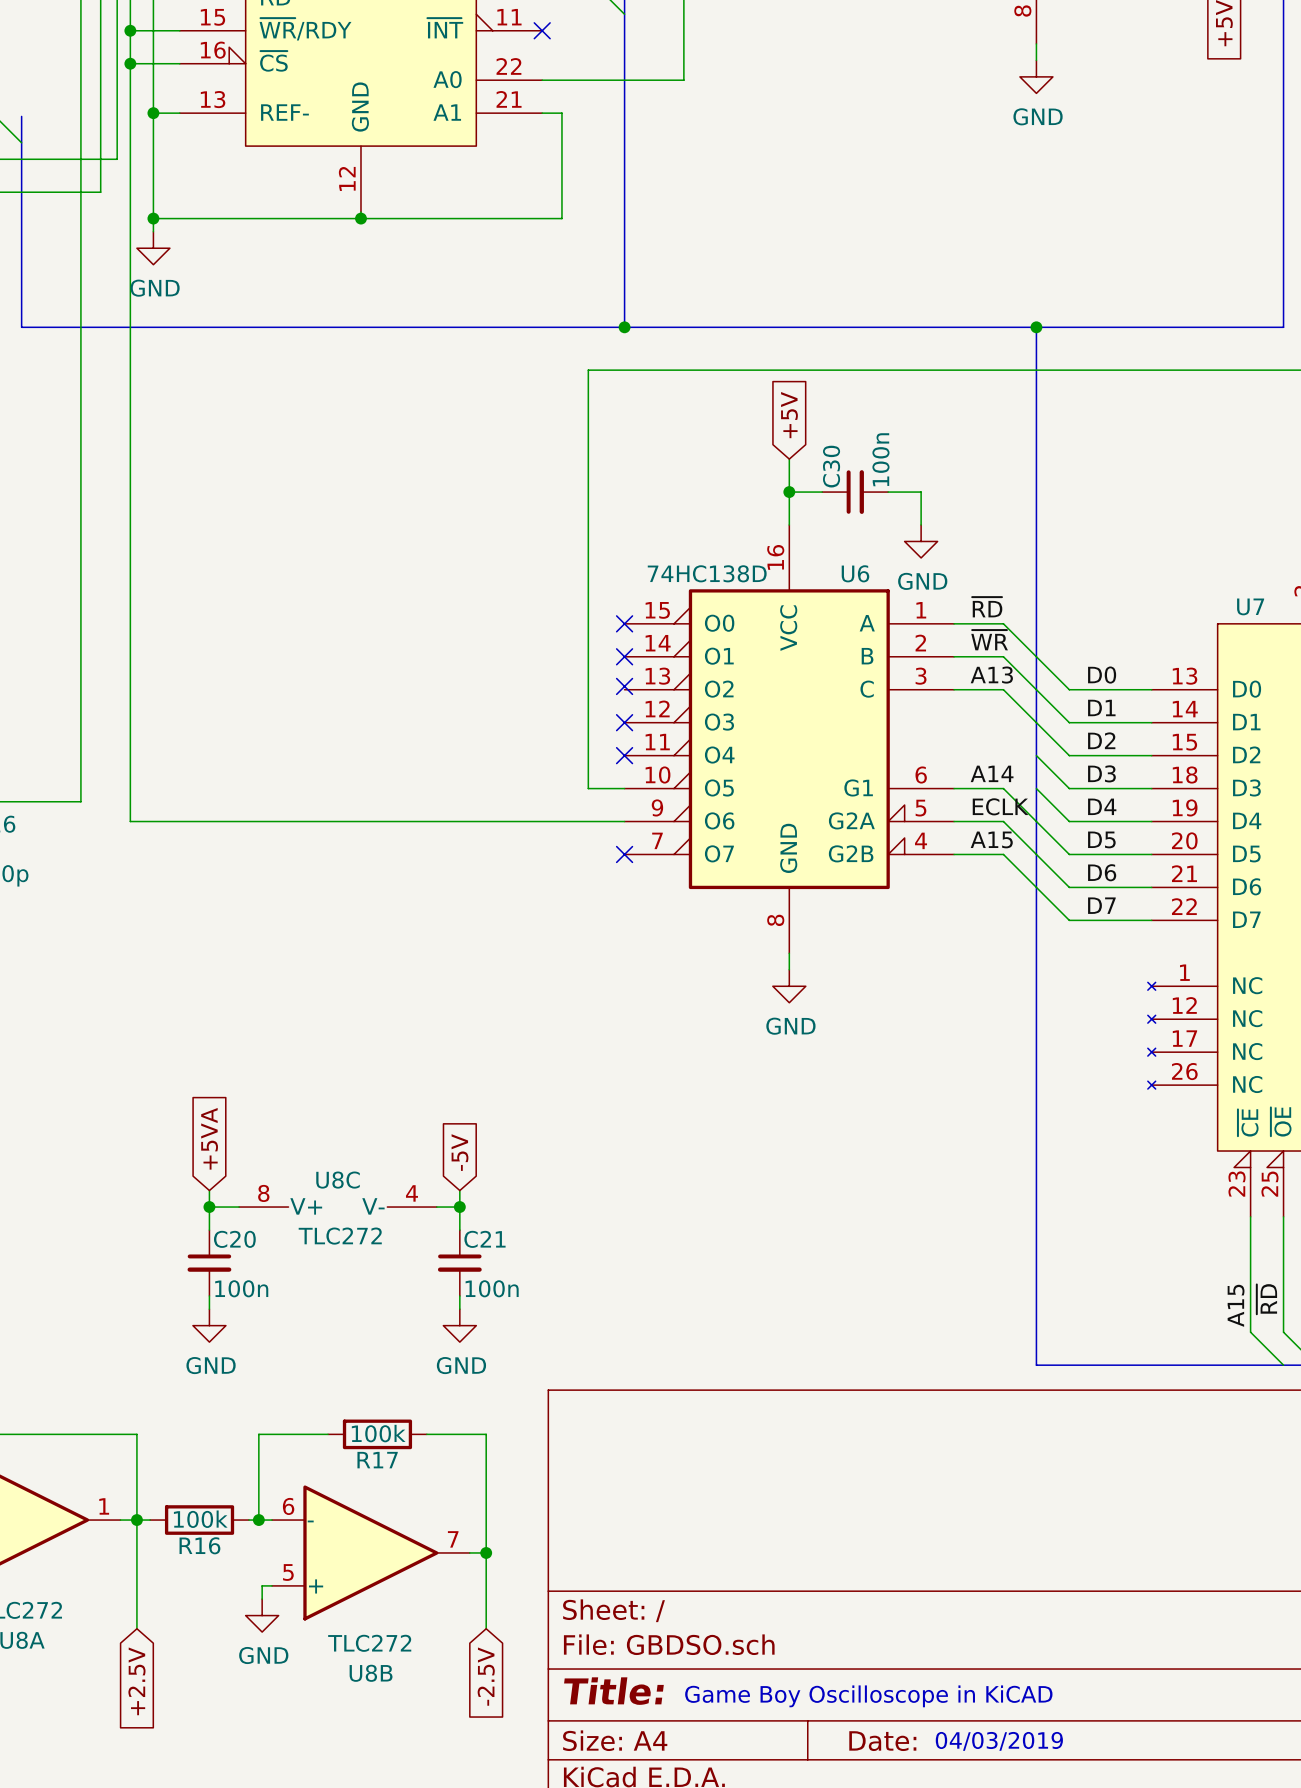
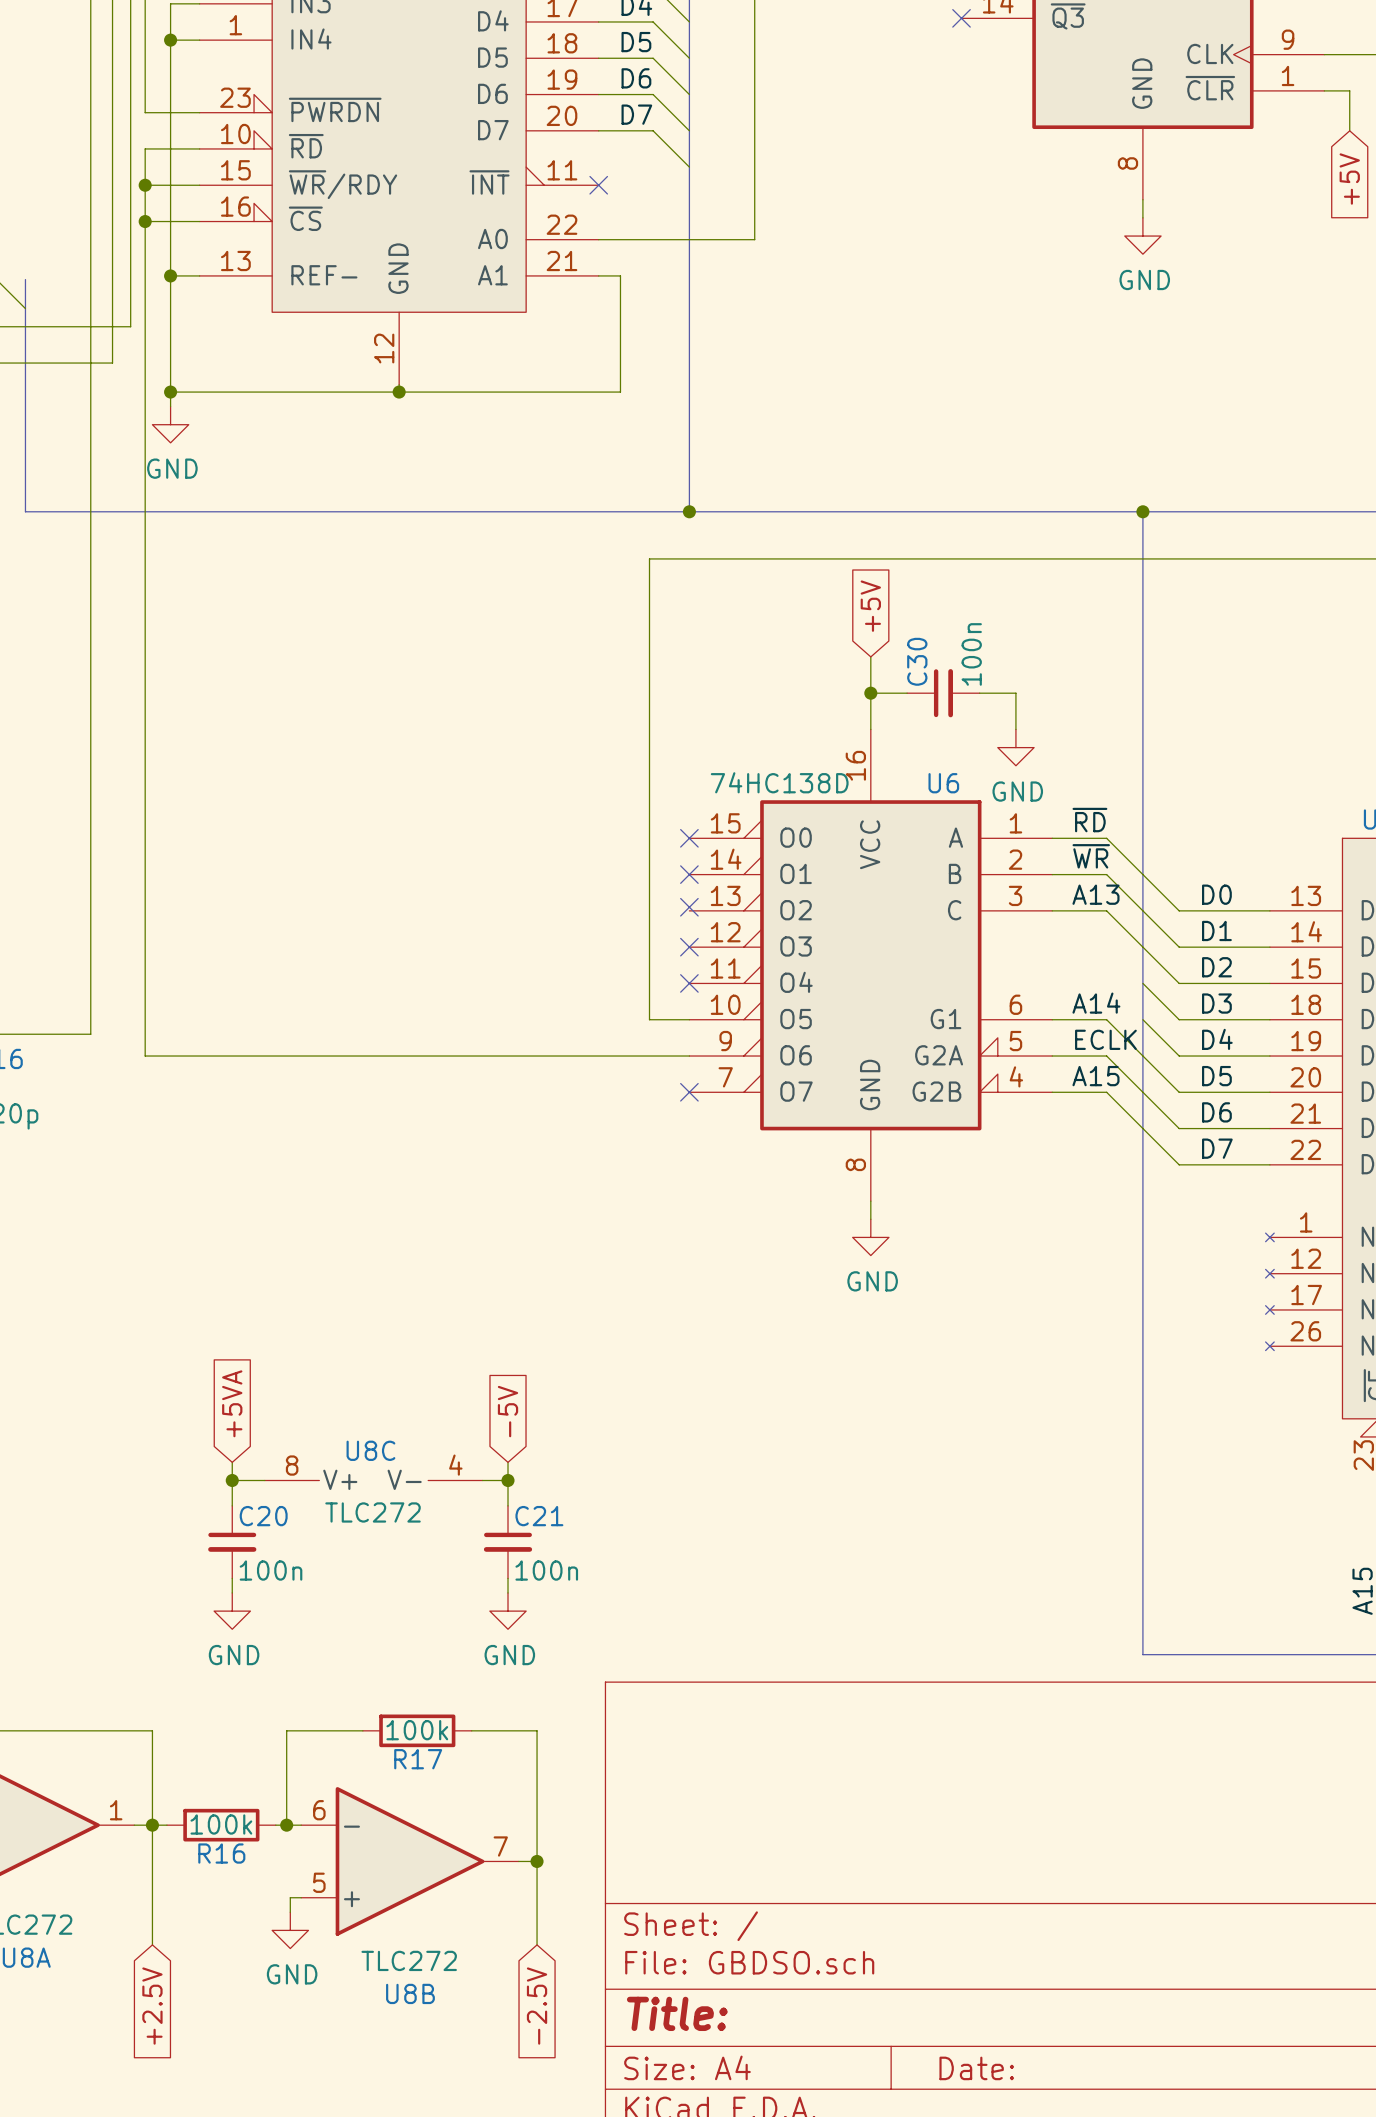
text: Game Boy Oscilloscope in KiCAD (868, 1696) -> none
text: 04/03/2019 (999, 1741) -> none

